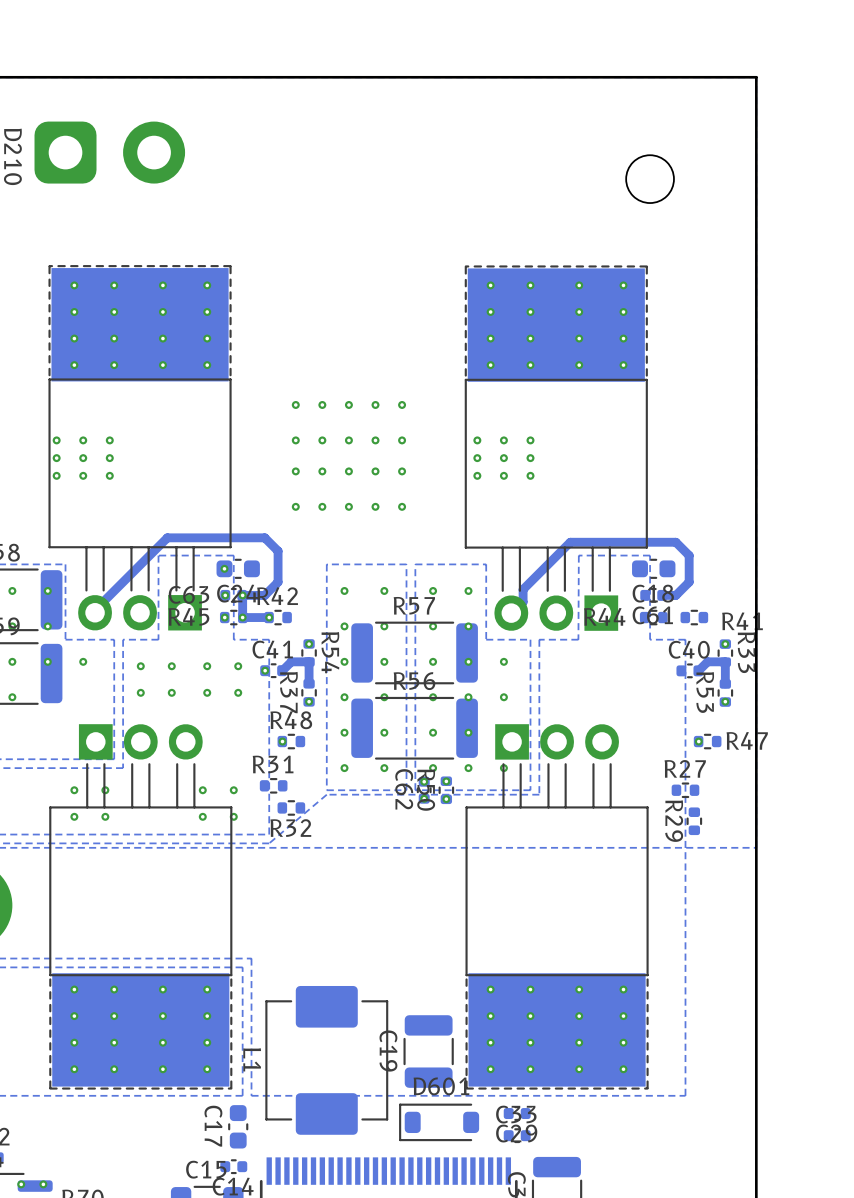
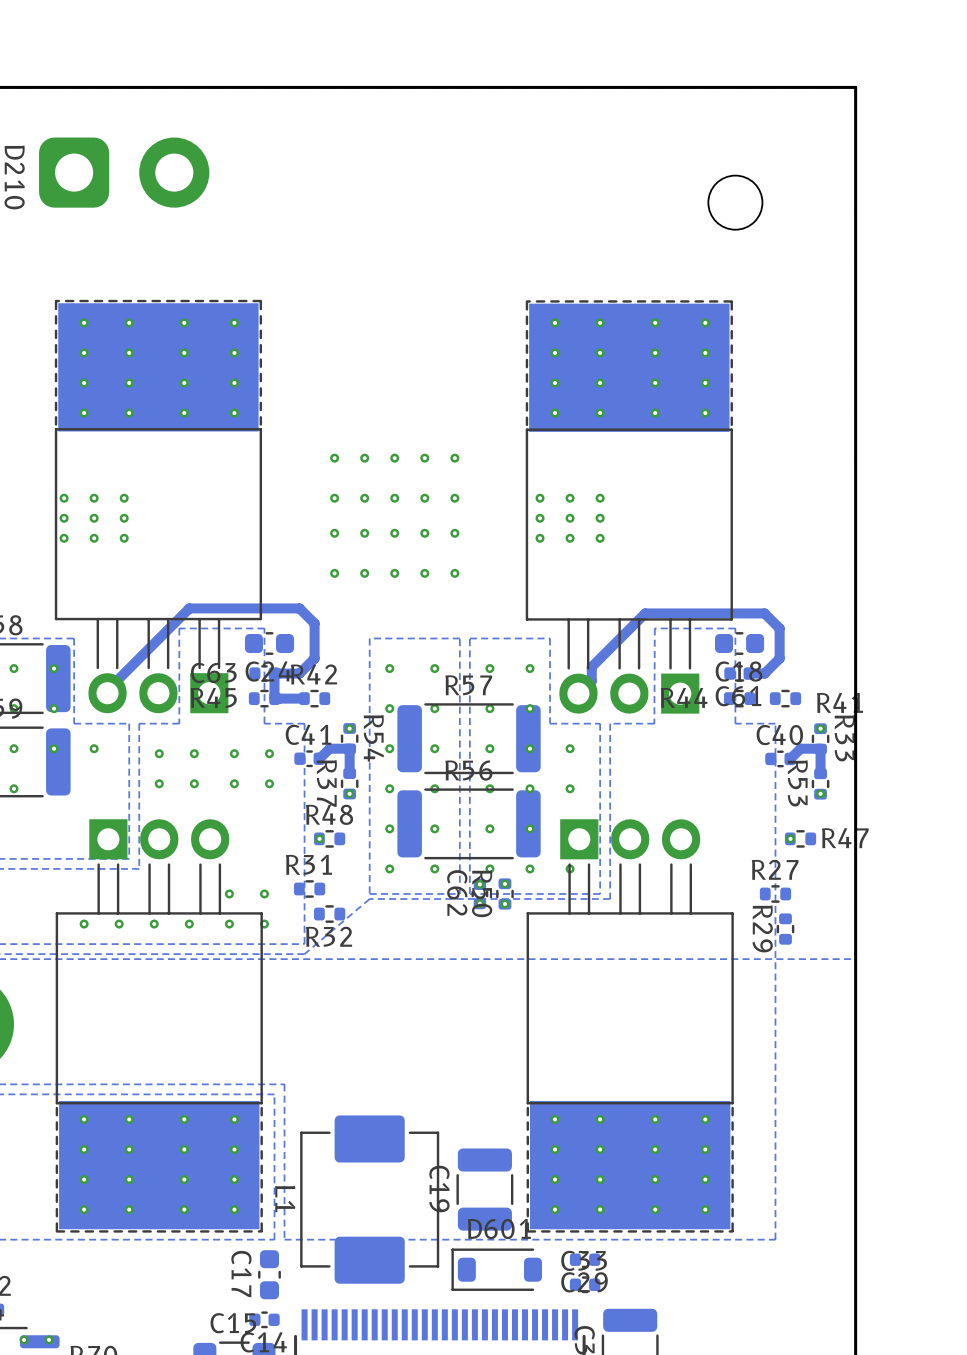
via: (224, 568) -> none
via: (225, 595) -> none
via: (242, 595) -> none
via: (224, 617) -> none
via: (242, 617) -> none
via: (269, 617) -> none
via: (265, 670) -> none
via: (74, 790) -> none
via: (105, 790) -> none
via: none -> (154, 924)
via: none -> (189, 924)

